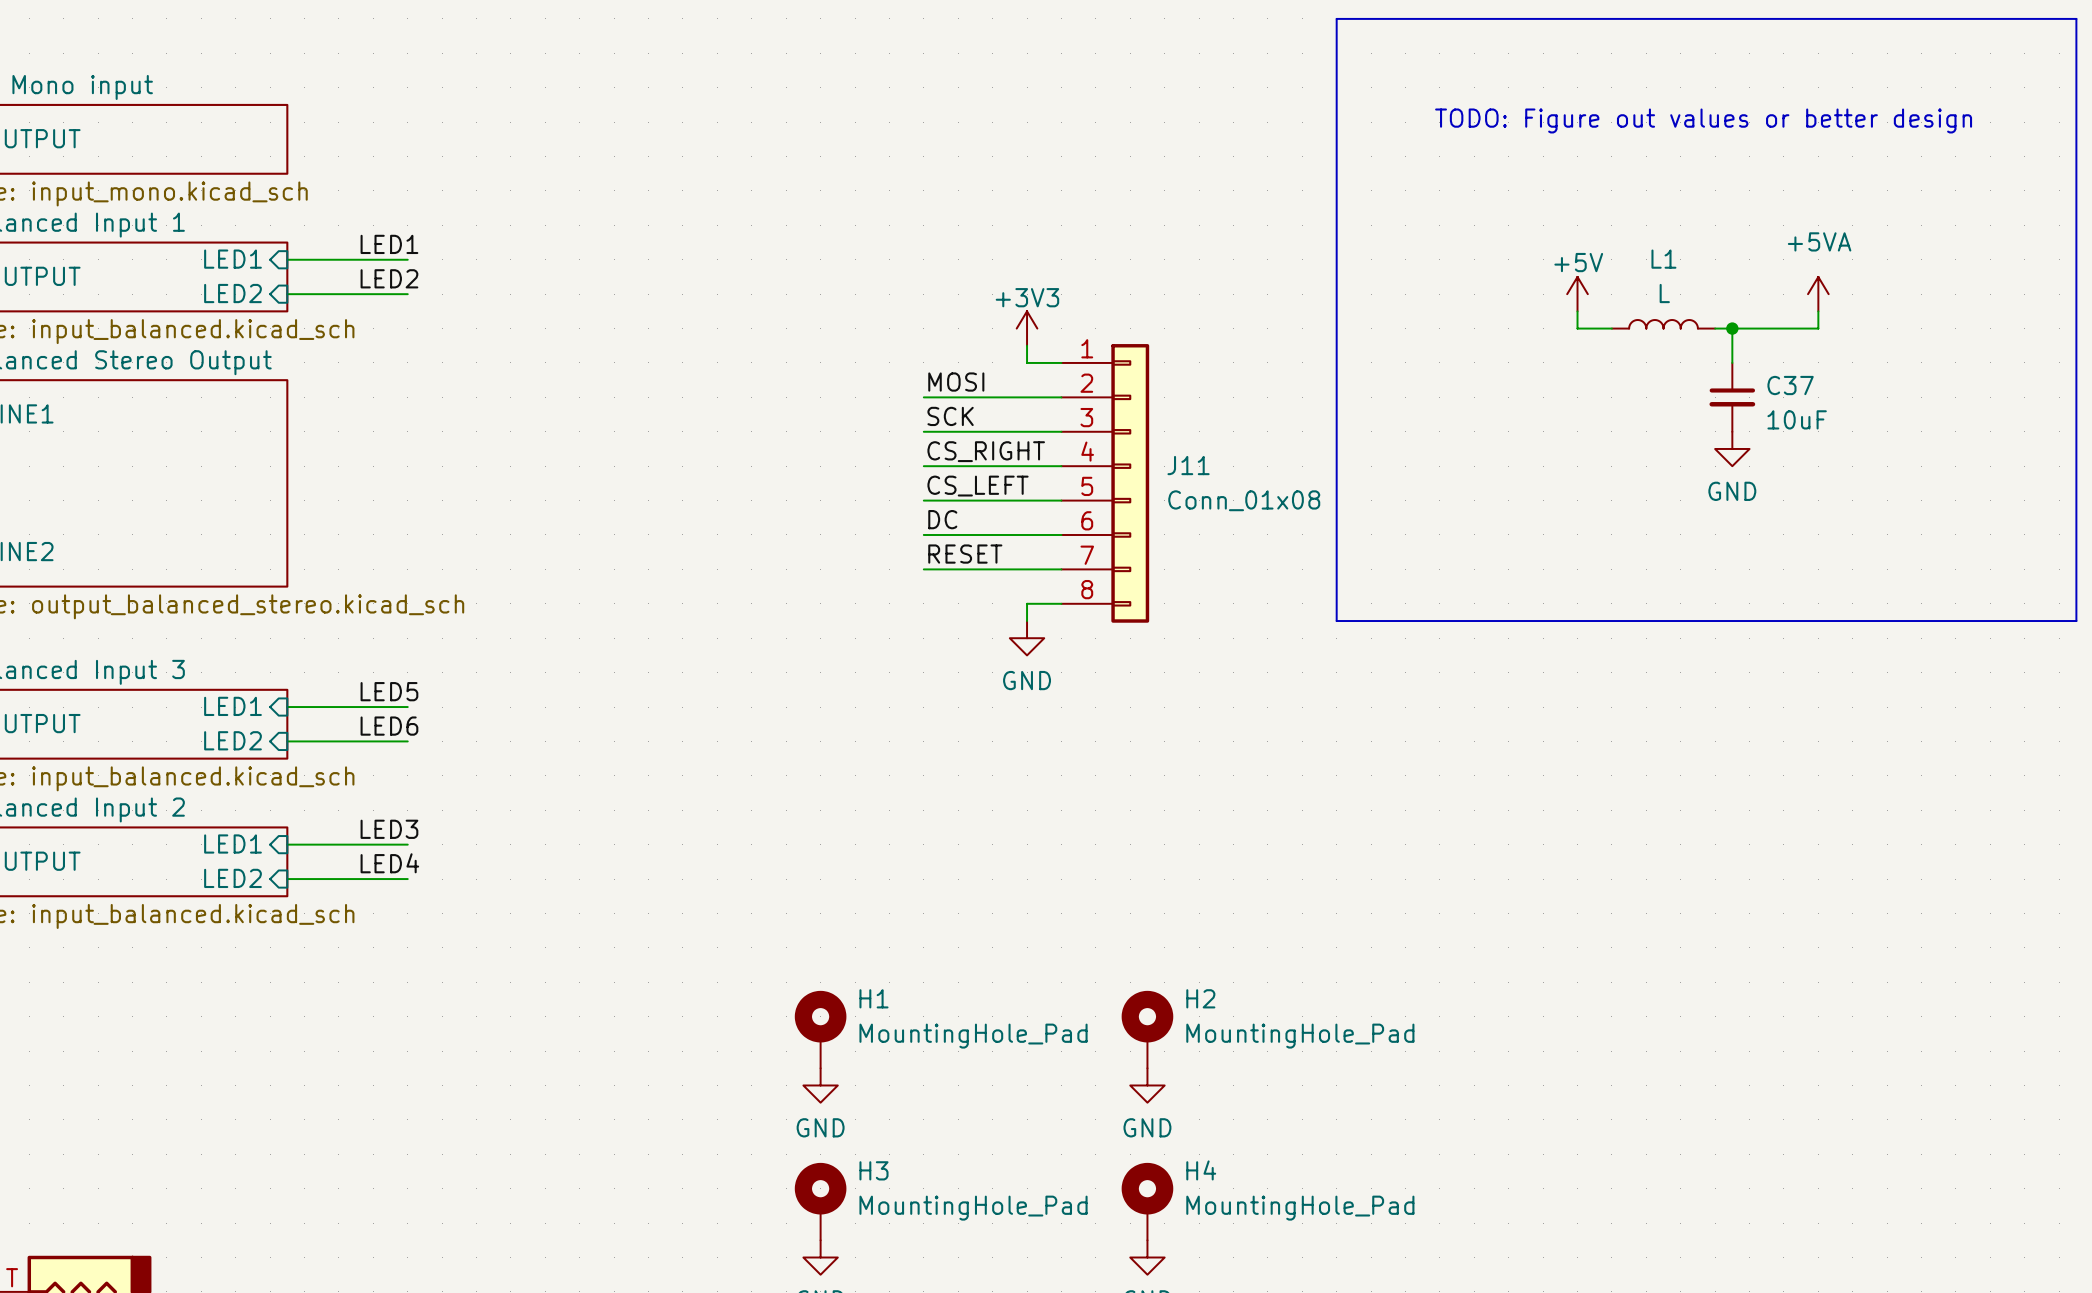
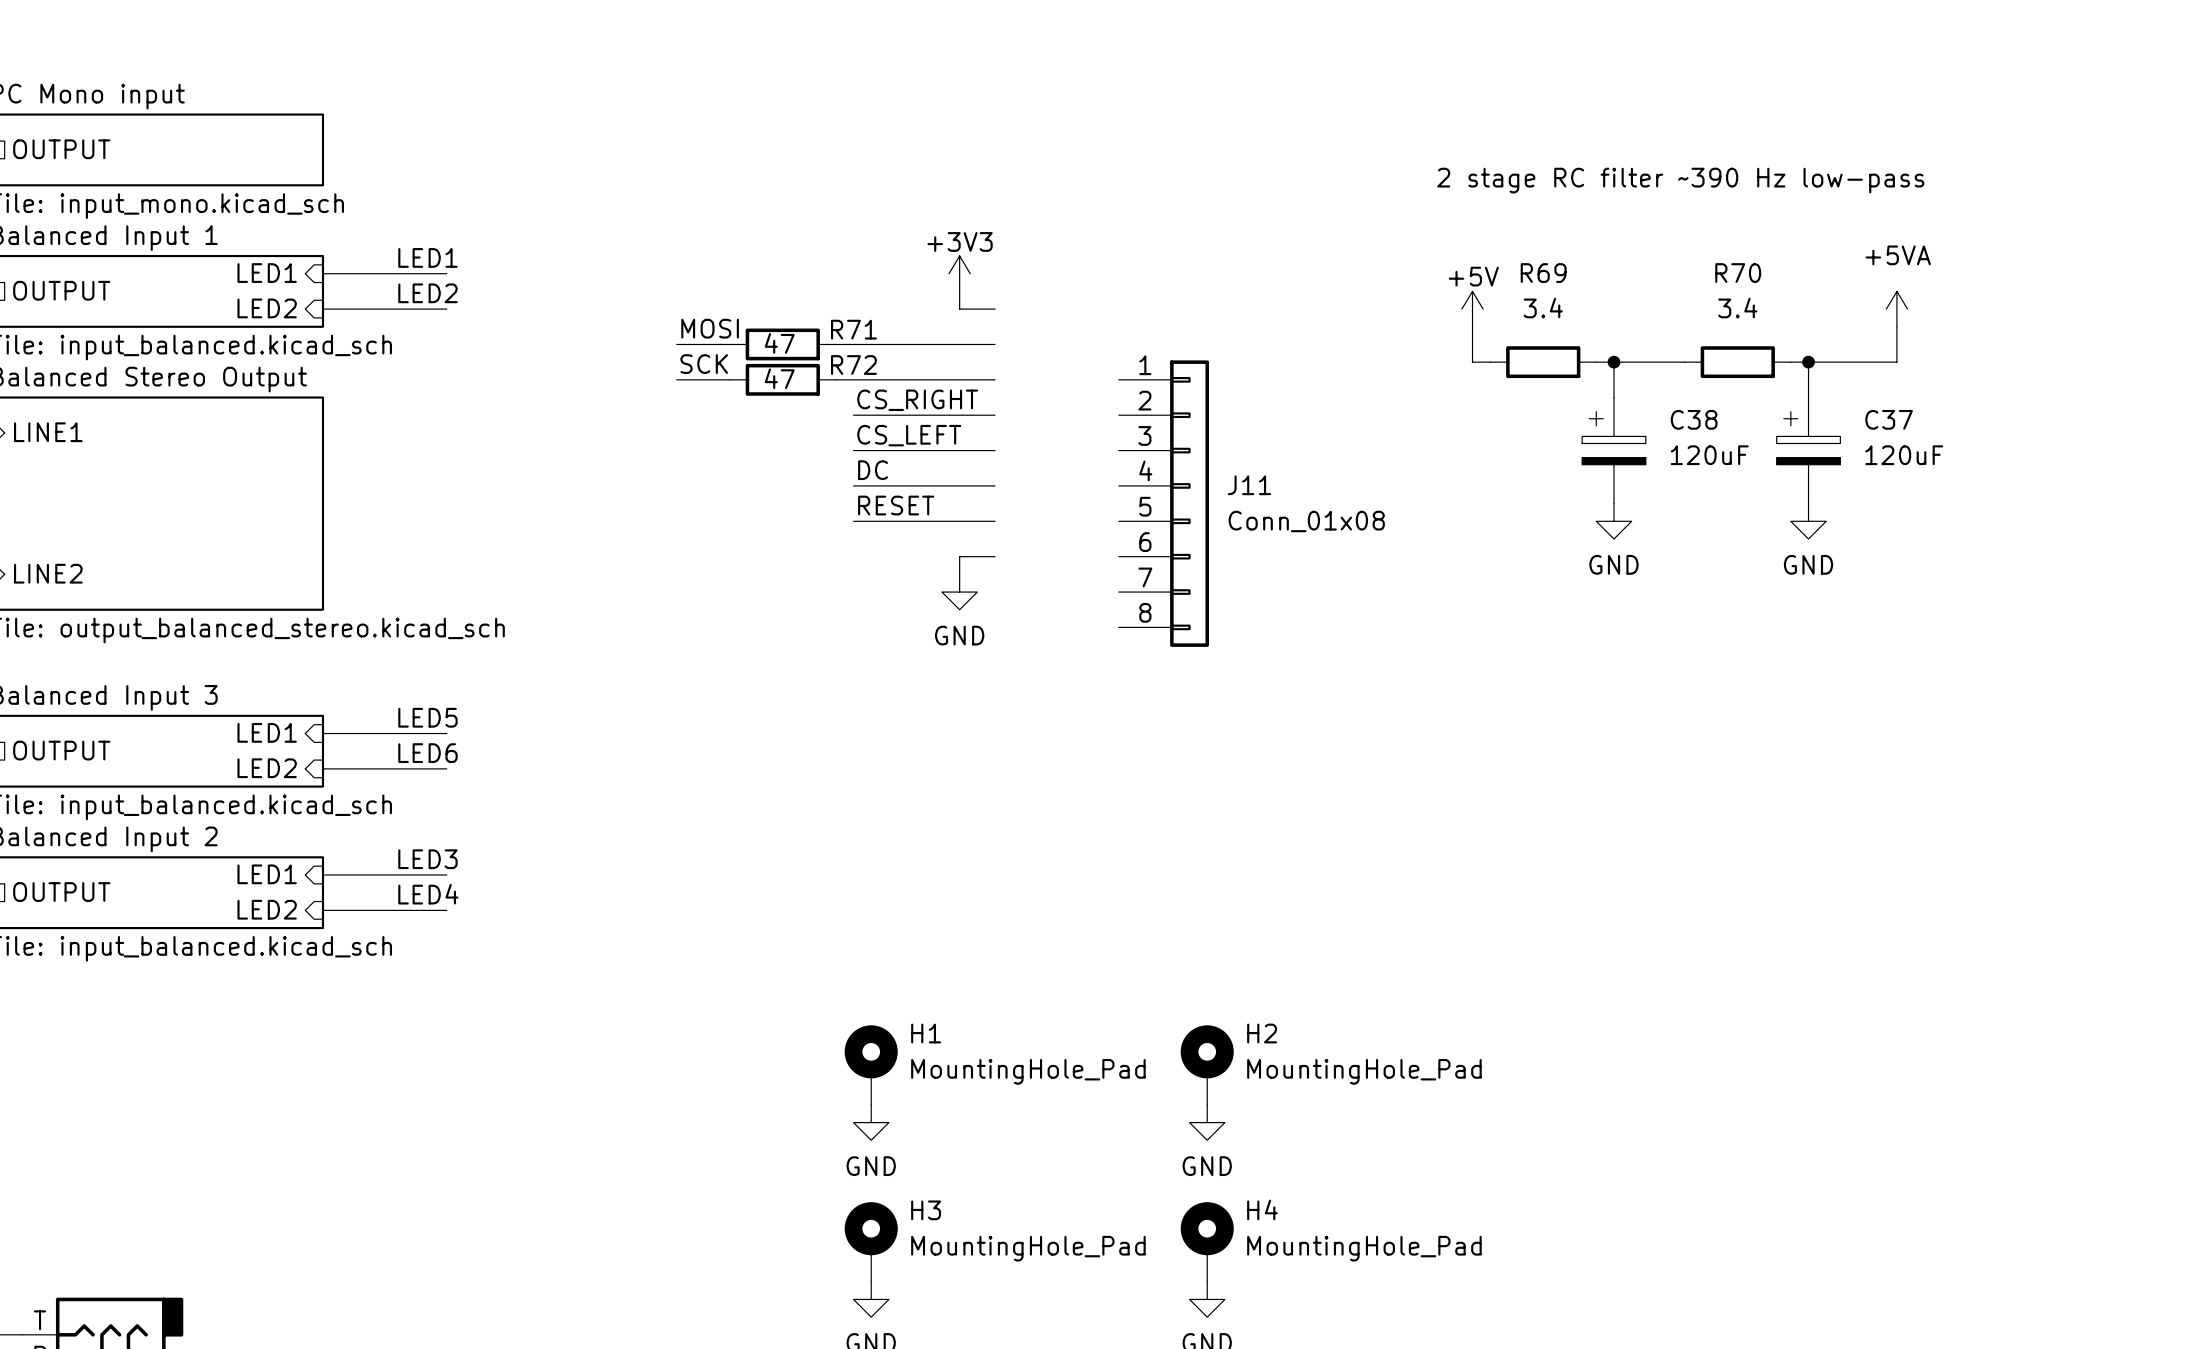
line: (1336, 18) (2076, 18) (2076, 621) (1336, 621) (1336, 18) -> none
text: TODO: Figure out values or better design (1703, 120) -> none
text: none -> 2 stage RC filter ~390 Hz low-pass (1680, 180)
power symbol position: +5V (1577, 294) -> +5V (1472, 309)
wire: none -> (1472, 326) (1472, 362) (1490, 362)
wire: (1577, 311) (1577, 328) (1611, 328) -> none
L1: L (1663, 324) -> none
wire: none -> (676, 344) (729, 344)
R71: none -> 47 (782, 344)
wire: none -> (835, 344) (995, 344)
power symbol position: +3V3 (1027, 328) -> +3V3 (959, 273)
wire: (1715, 328) (1818, 328) -> (1790, 362) (1896, 362) (1896, 344)
junction position: (1732, 328) -> (1808, 362)
wire: (1027, 345) (1027, 362) (1061, 362) -> (959, 291) (959, 309) (995, 309)
R69: none -> 3.4 (1543, 362)
wire: none -> (1596, 362) (1684, 362)
wire: none -> (1613, 362) (1613, 397)
junction: none -> (1613, 362)
R70: none -> 3.4 (1737, 362)
wire: none -> (676, 379) (729, 379)
R72: none -> 47 (782, 379)
wire: none -> (835, 379) (995, 379)
C37 symbol: [1709, 362, 1756, 432] -> [1776, 397, 1841, 504]
label position: MOSI (956, 382) -> MOSI (710, 328)
wire: (941, 397) (1061, 397) -> (853, 415) (977, 415)
label position: SCK (950, 416) -> SCK (704, 364)
C37 value: 10uF (1797, 419) -> 120uF (1904, 455)
wire: (941, 431) (1061, 431) -> (853, 450) (977, 450)
C38: none -> 120uF (1613, 450)
power symbol position: GND (1732, 448) -> GND (1808, 521)
label position: CS_RIGHT (986, 451) -> CS_RIGHT (917, 400)
wire: (941, 466) (1061, 466) -> (853, 485) (977, 485)
label position: CS_LEFT (978, 486) -> CS_LEFT (909, 435)
wire: (941, 500) (1061, 500) -> (853, 521) (977, 521)
power symbol: none -> GND (1613, 521)
label position: DC (942, 519) -> DC (873, 470)
wire: none -> (977, 556) (959, 556) (959, 574)
wire: (941, 534) (1061, 534) -> none
label position: RESET (965, 554) -> RESET (896, 505)
wire: (923, 569) (1061, 569) -> none
wire: (1061, 603) (1027, 603) (1027, 621) -> none
power symbol position: GND (1027, 638) -> GND (959, 592)

